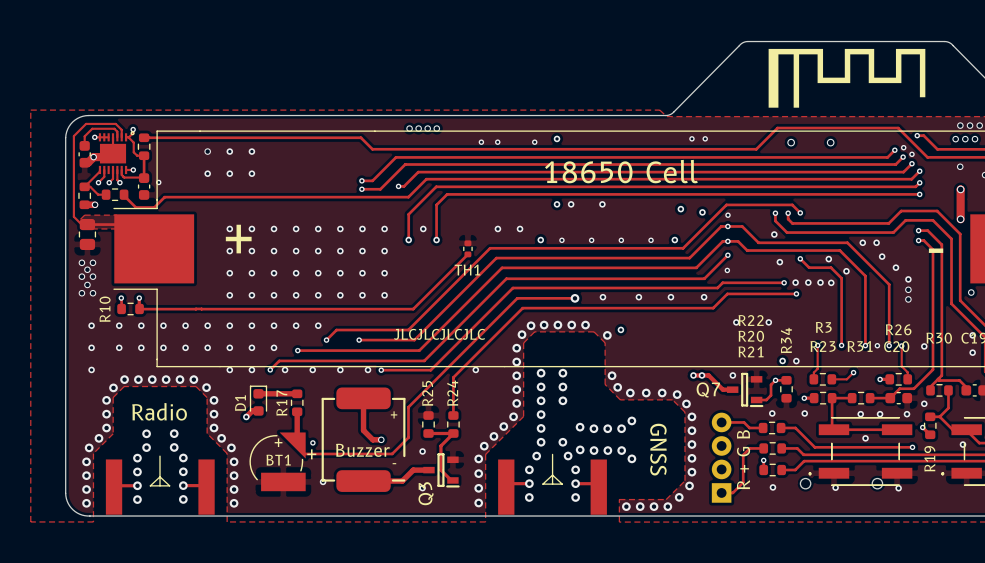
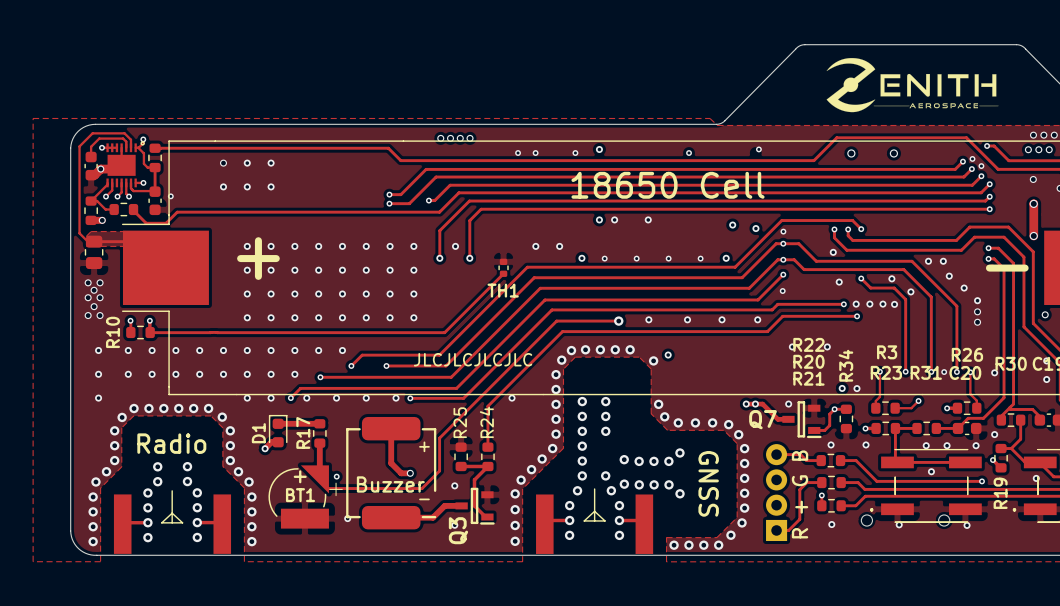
drawing shape: [768, 48, 926, 108] -> [826, 58, 999, 113]
via position: (691, 138) -> (689, 153)

